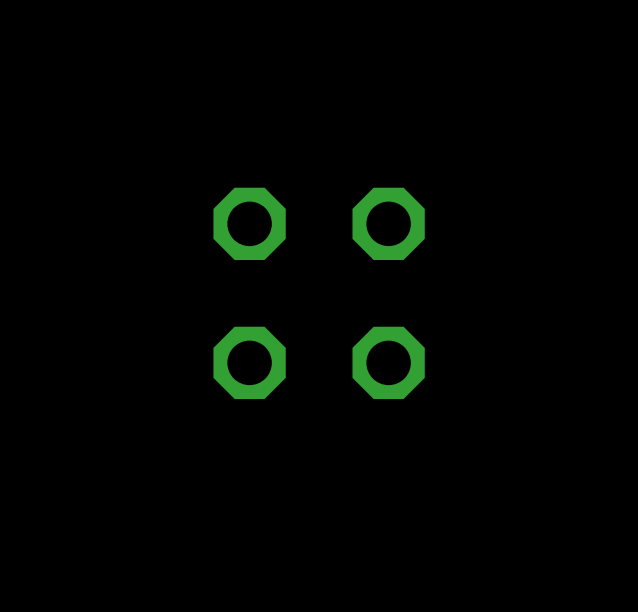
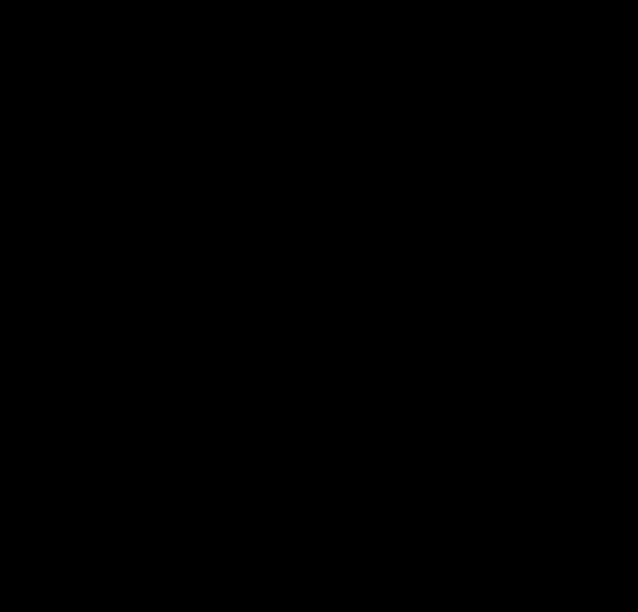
part: (319, 293) -> none

